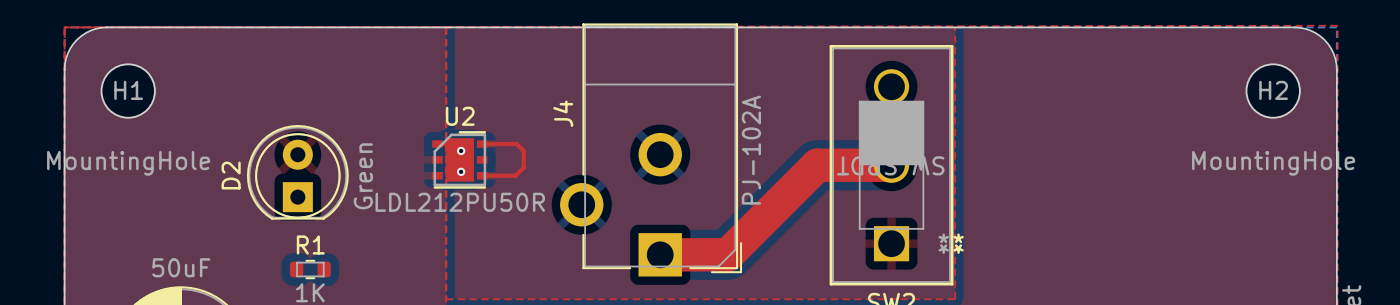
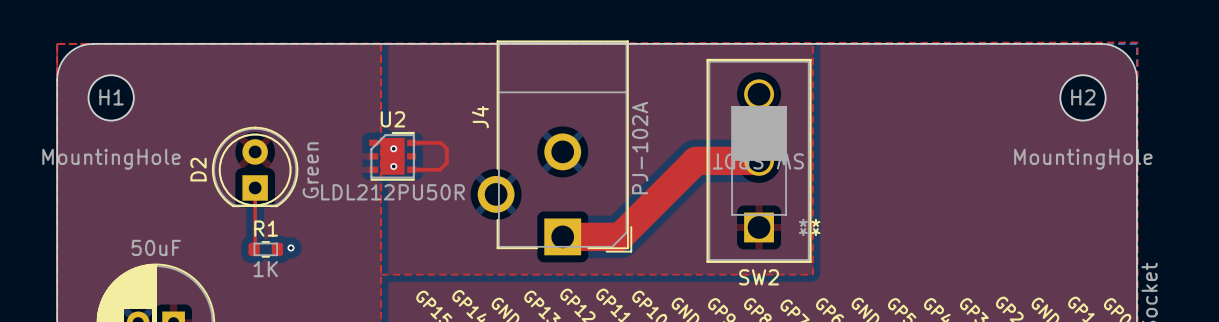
top track: none -> (255, 187) (254, 249)
via: none -> (291, 247)

